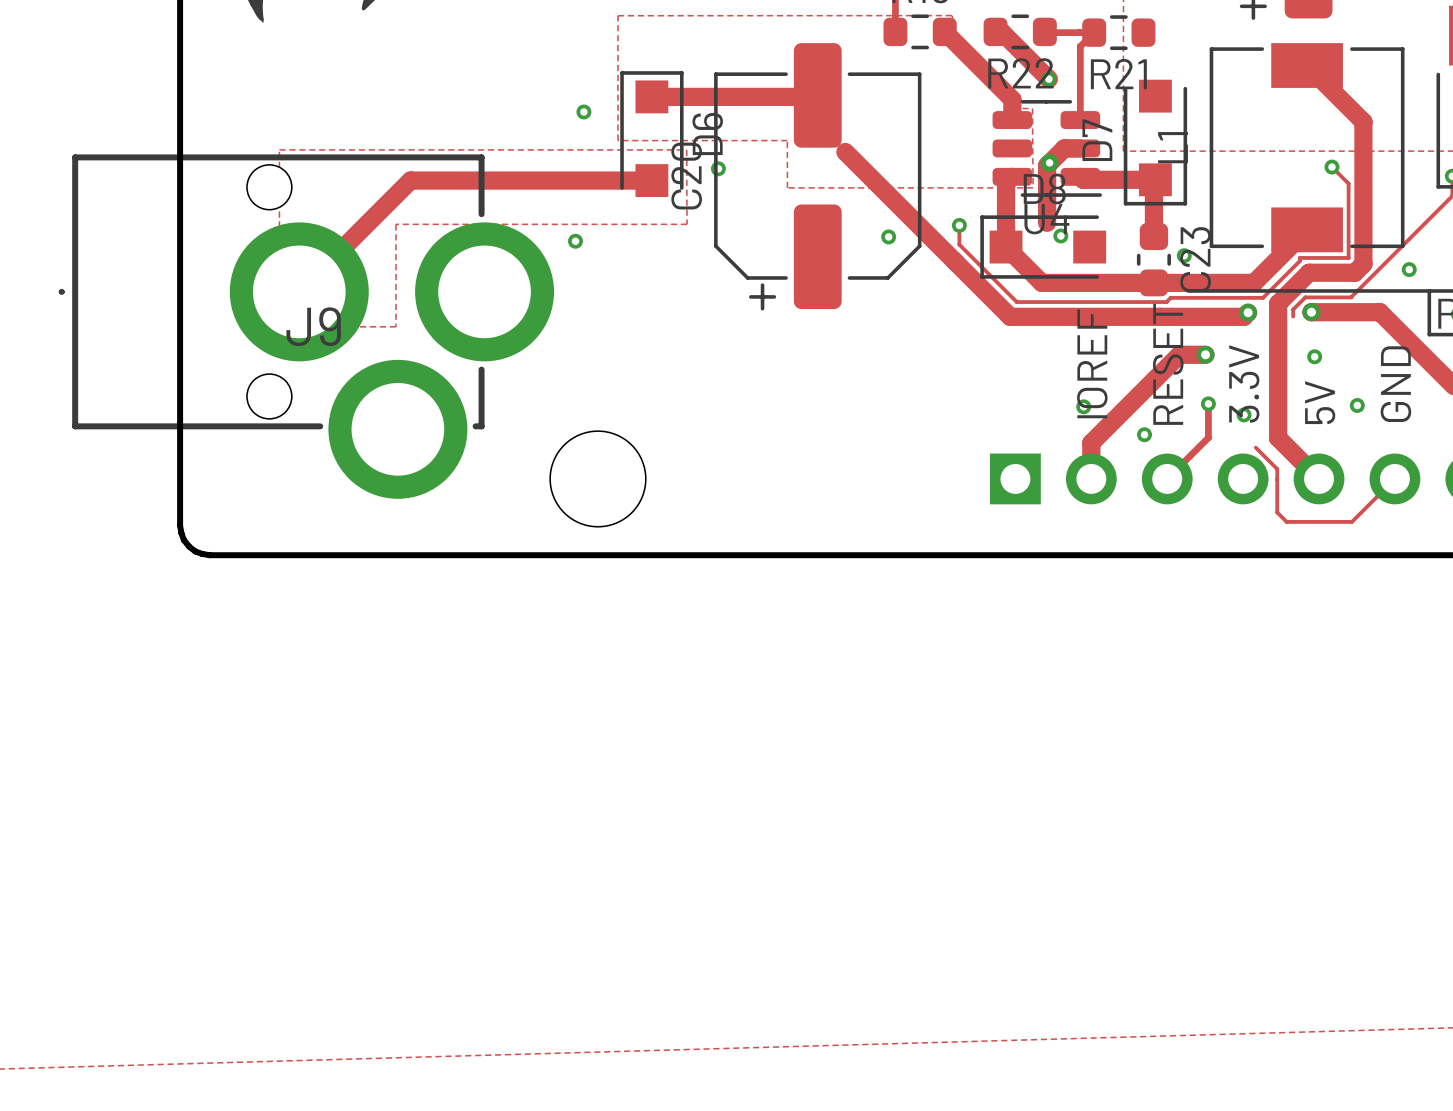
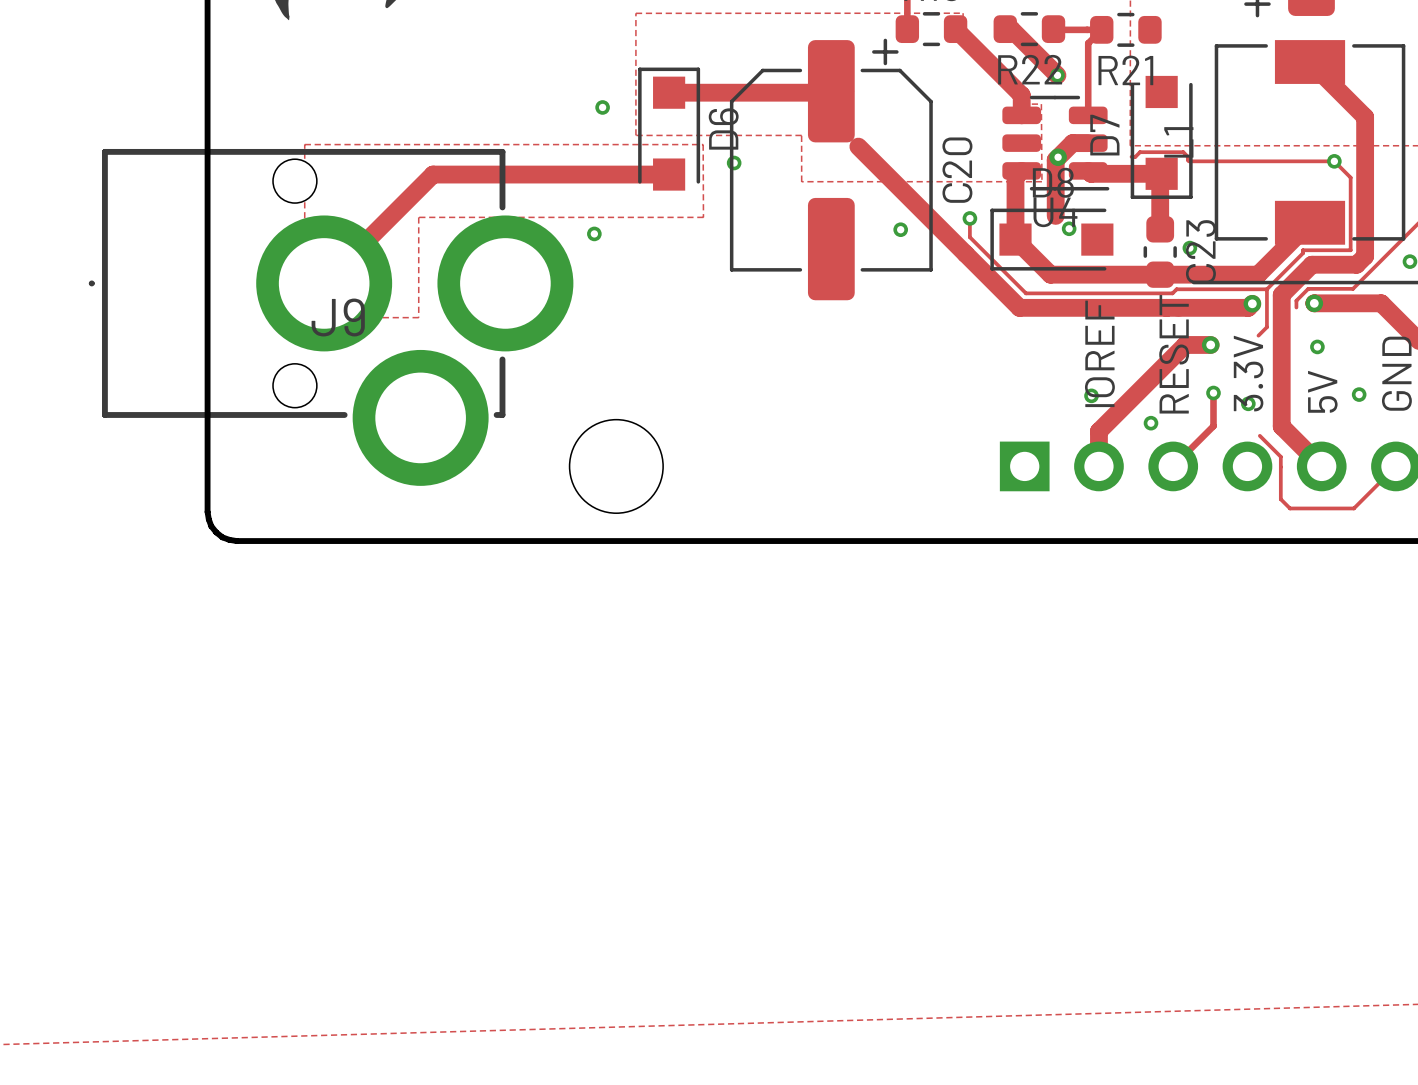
track: none -> (1131, 156) (1135, 156) (1140, 152) (1183, 152) (1189, 161) (1334, 161)
C20 rotation: 0° (817, 176) -> 180° (831, 169)
track: none -> (1266, 289) (1266, 327) (1258, 335)

